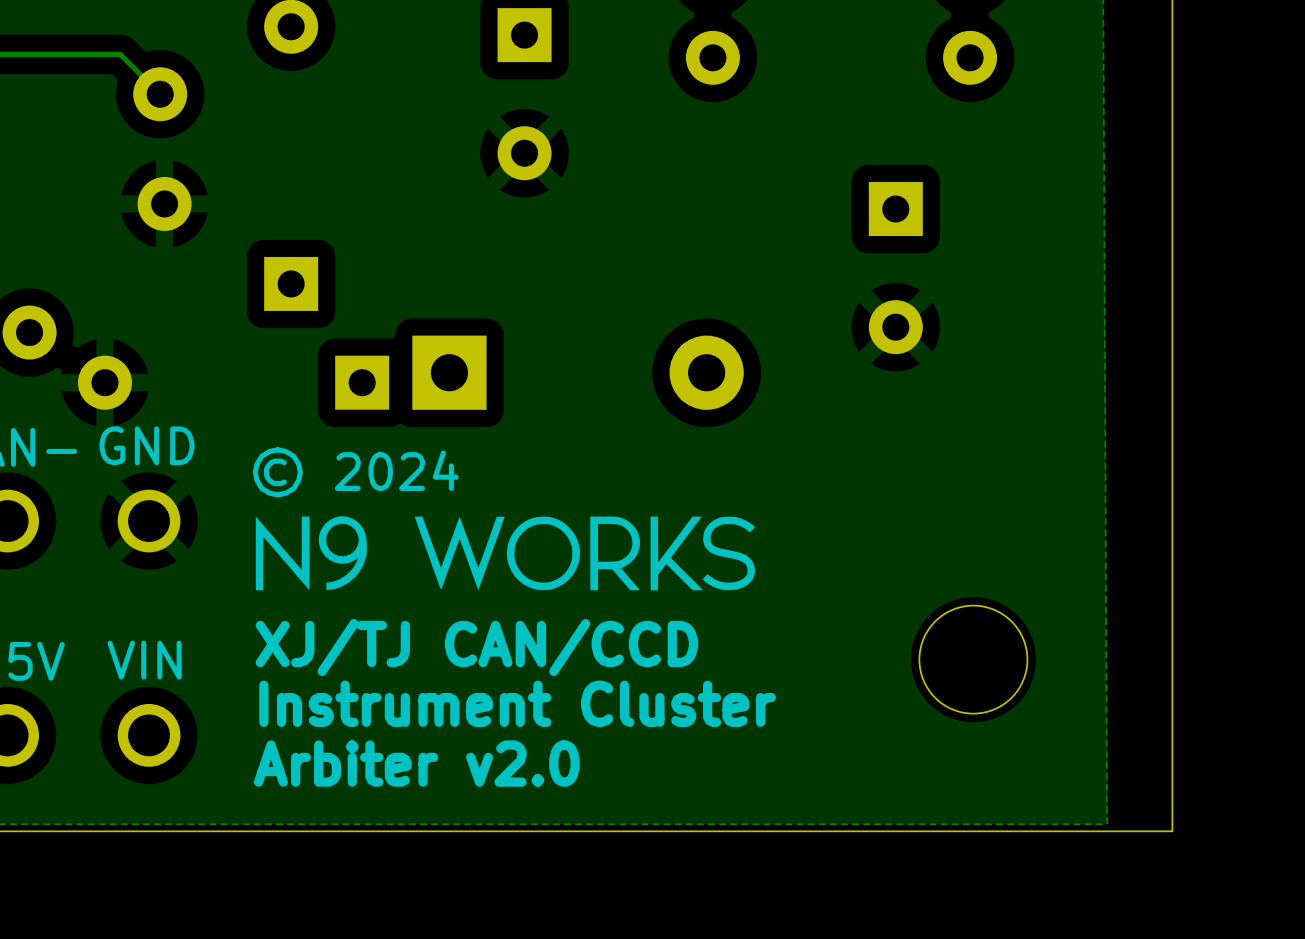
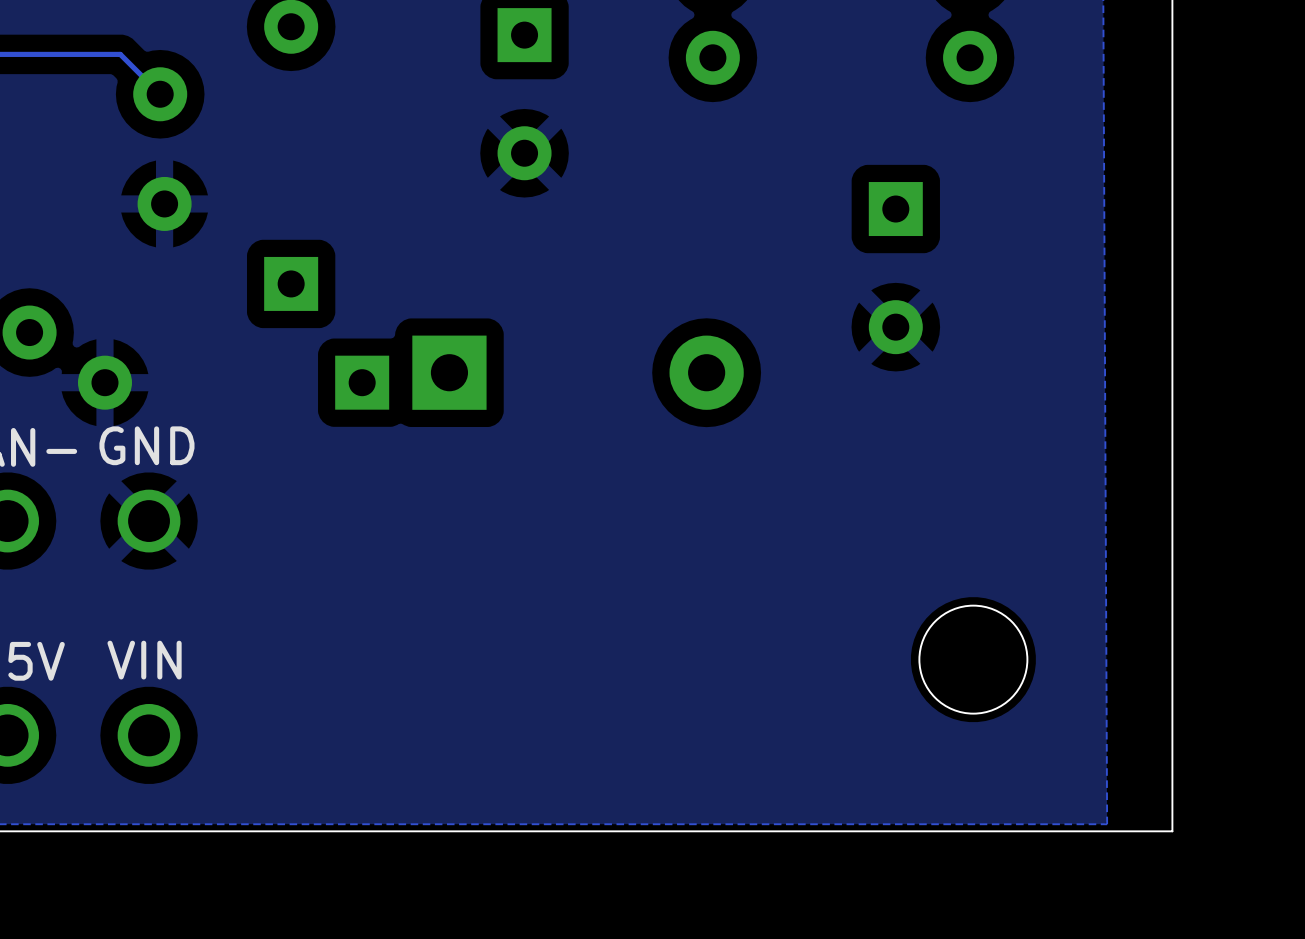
text: © 2024 (355, 472) -> none
drawing: [255, 516, 756, 591] -> none
text: XJ/TJ CAN/CCD (476, 647) -> none
text: Instrument Cluster (517, 703) -> none
text: Arbiter v2.0 (416, 763) -> none

